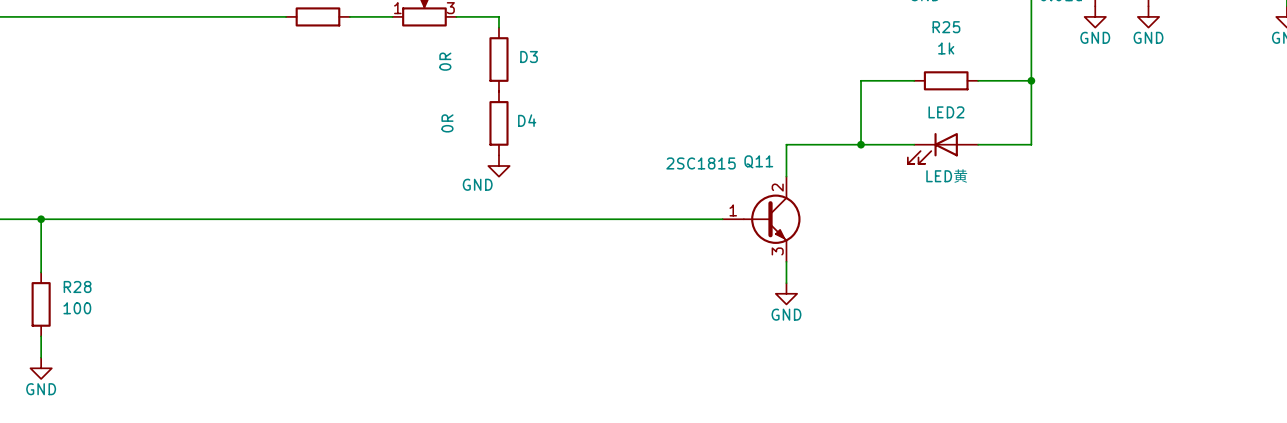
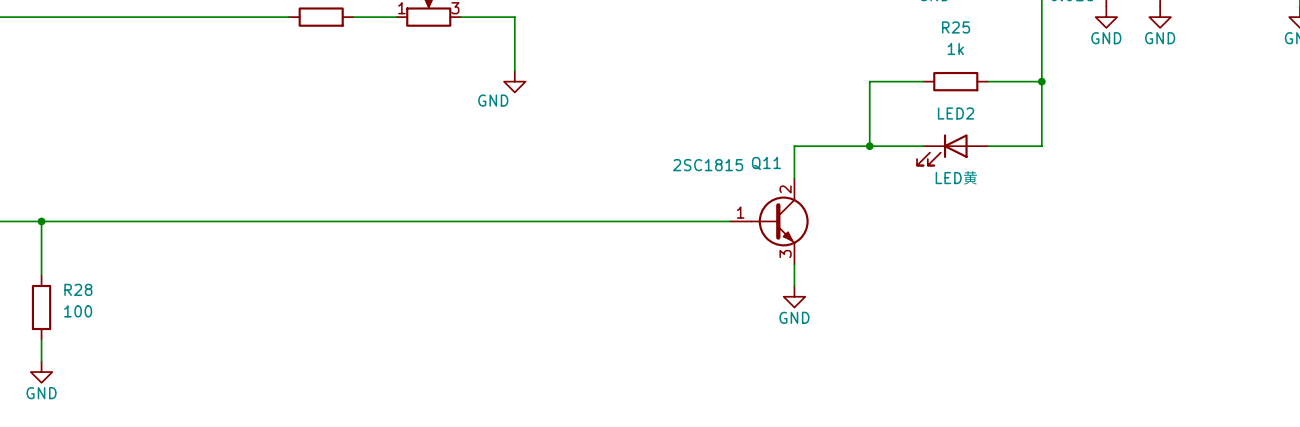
wire: (498, 16) (498, 27) -> (504, 17) (514, 17) (514, 70)
D3: 0R (498, 59) -> none
D4: 0R (498, 123) -> none
power symbol position: GND (498, 166) -> GND (514, 81)

